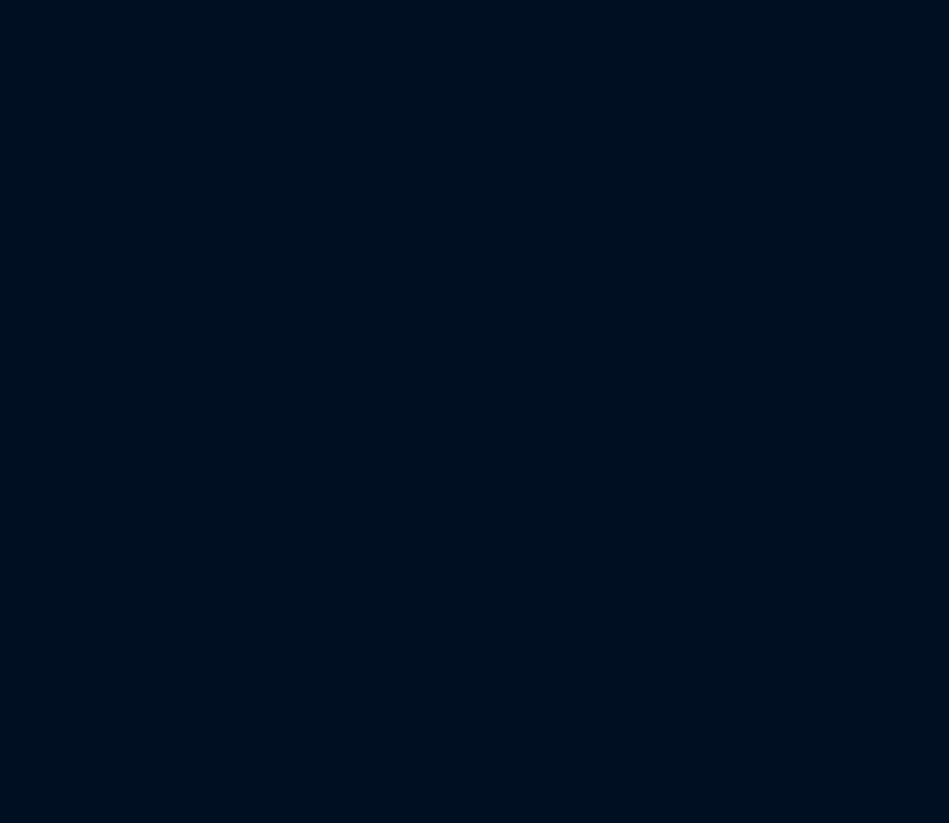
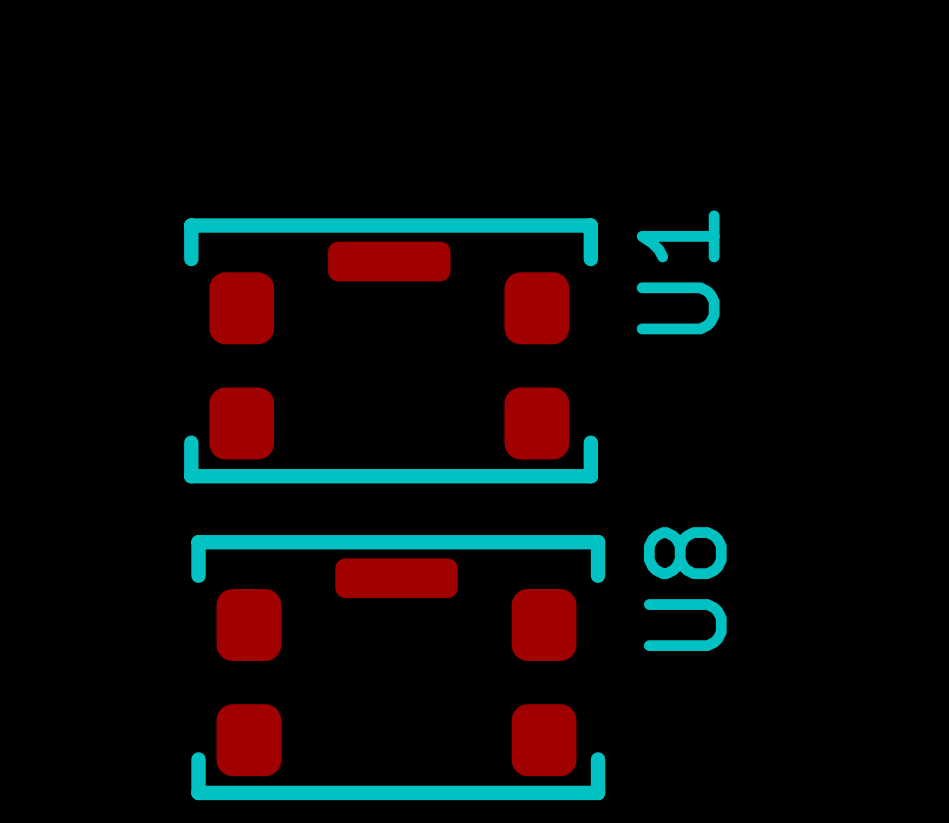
U1: none -> (391, 350)
U8: none -> (398, 667)

